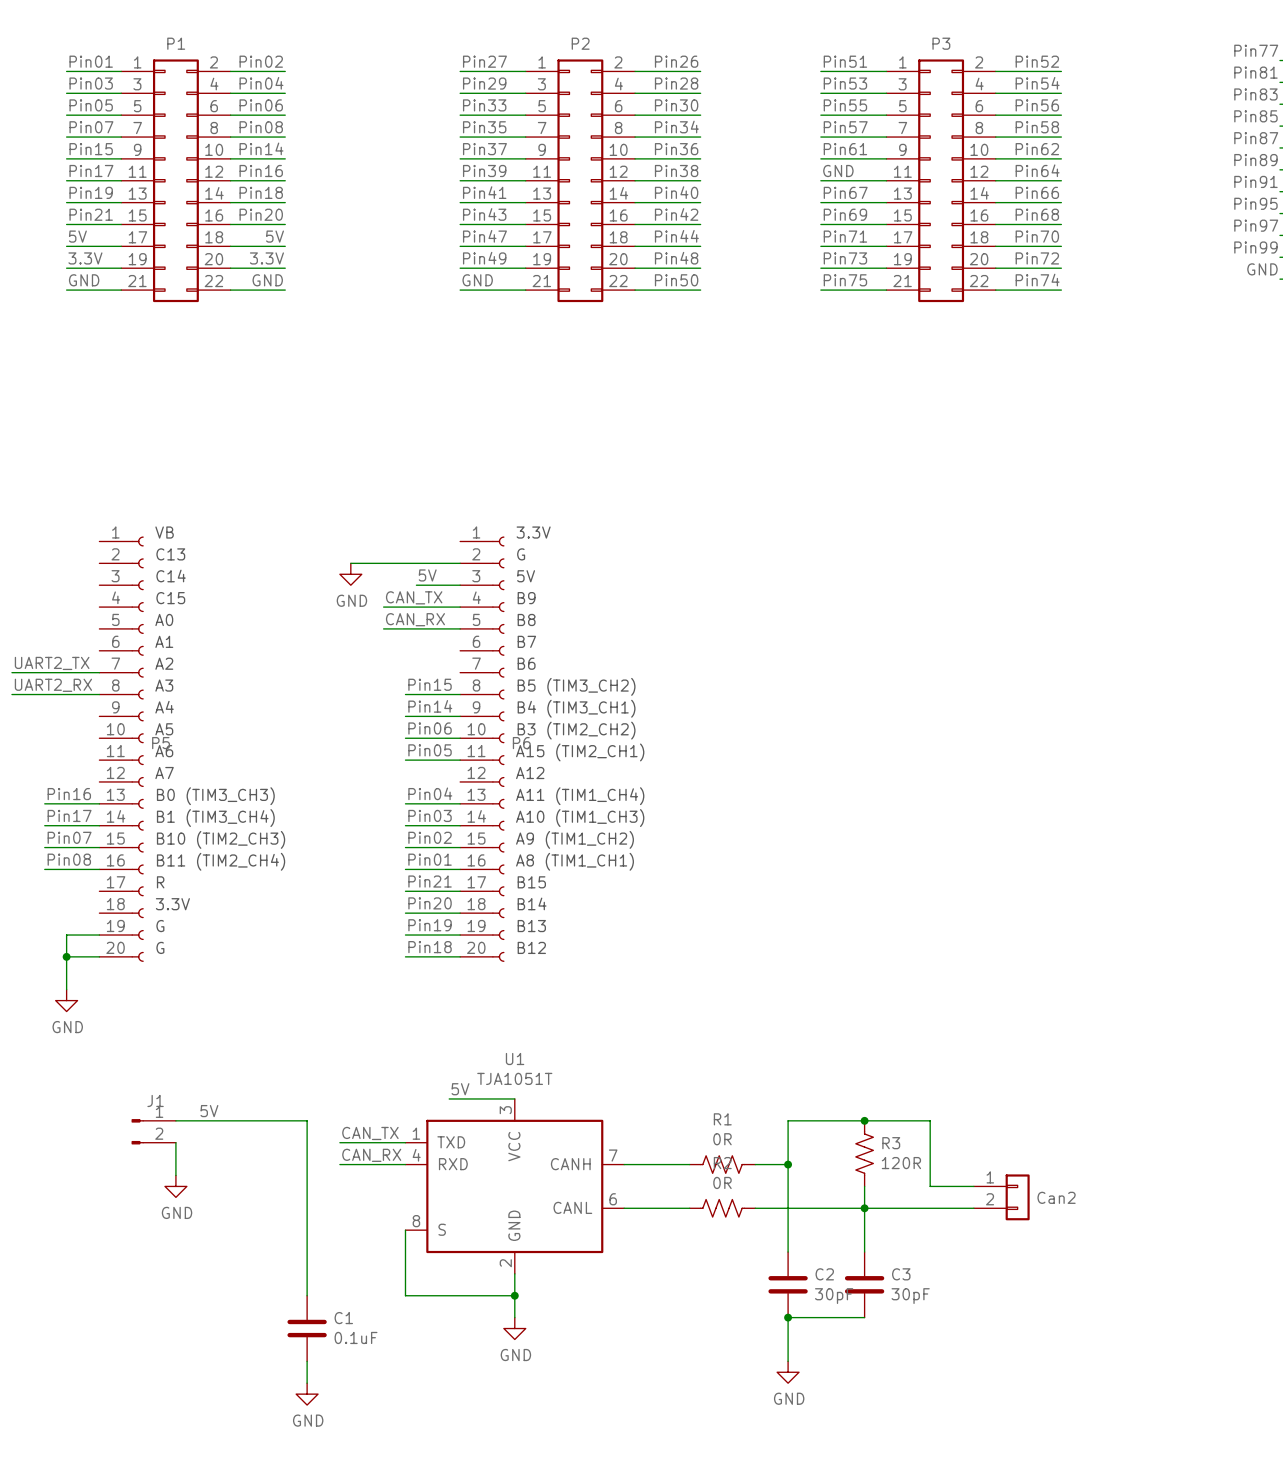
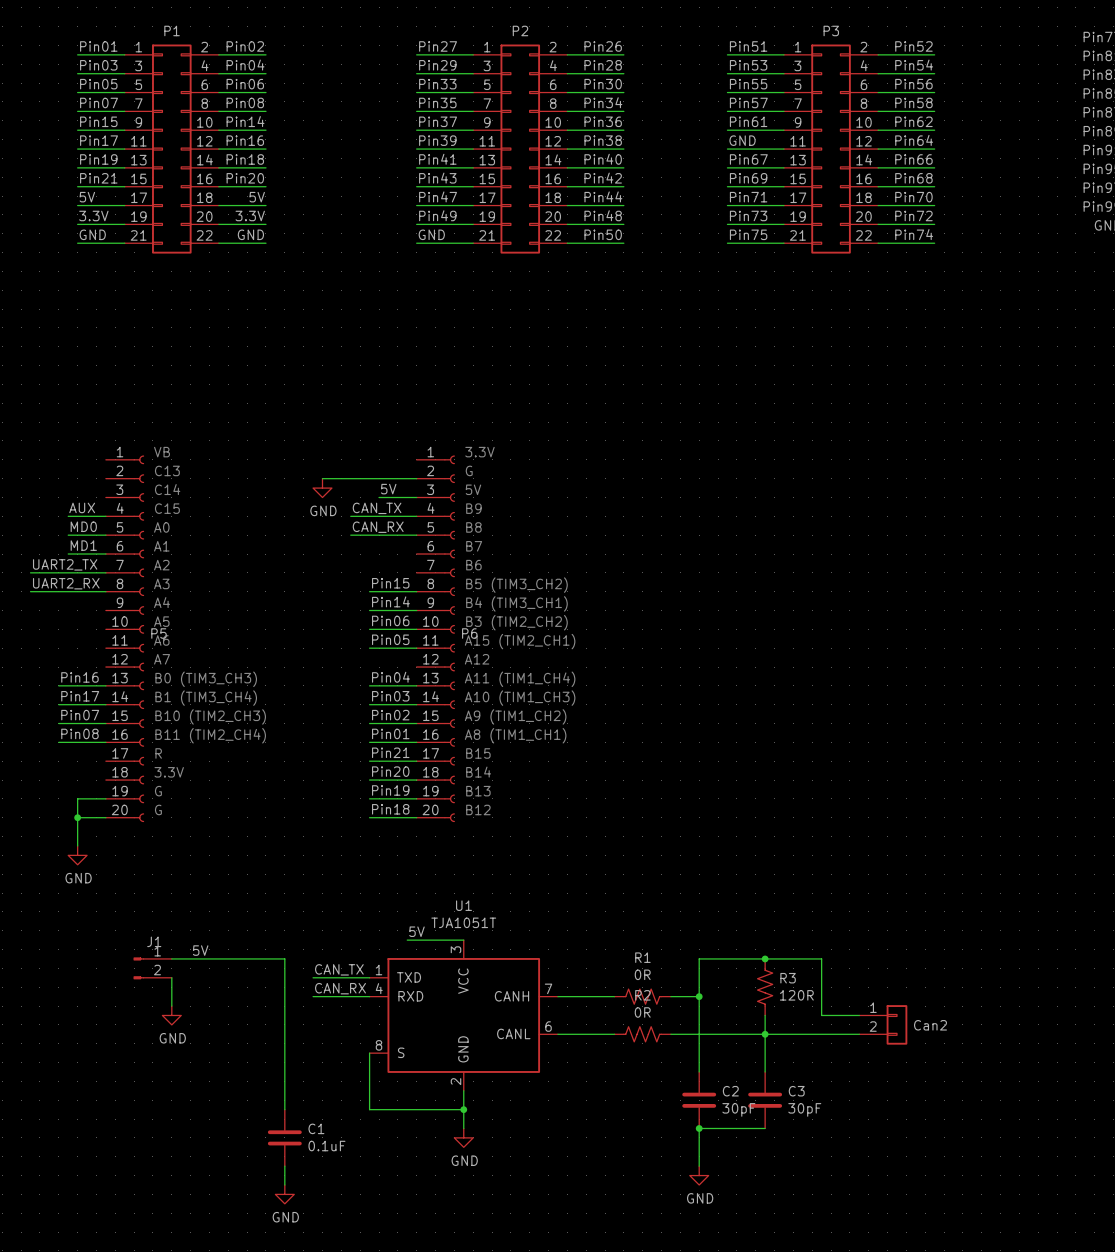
label: none -> AUX (82, 507)
wire: none -> (68, 516) (105, 516)
label: none -> MD0 (83, 526)
wire: none -> (68, 535) (105, 535)
label: none -> MD1 (83, 545)
wire: none -> (68, 554) (105, 554)

